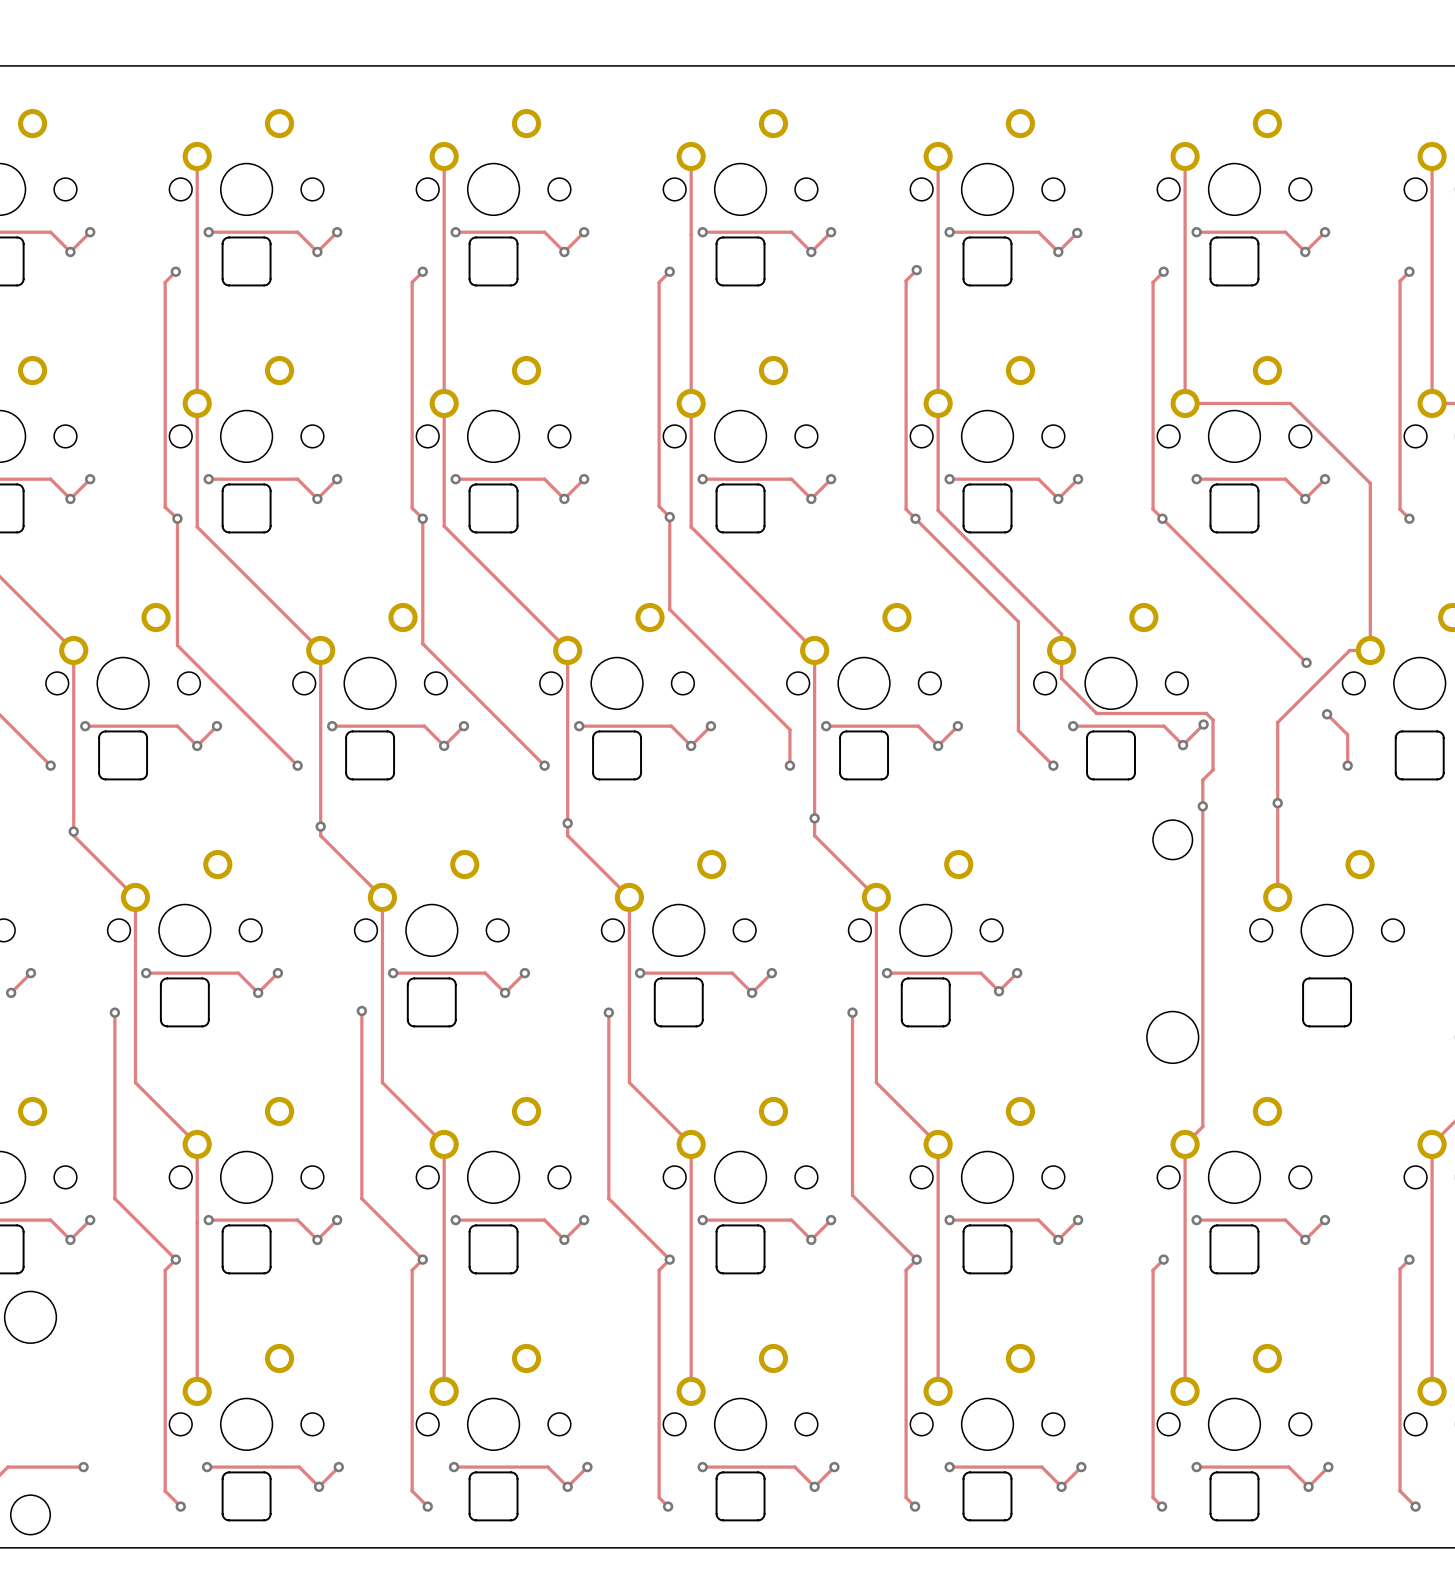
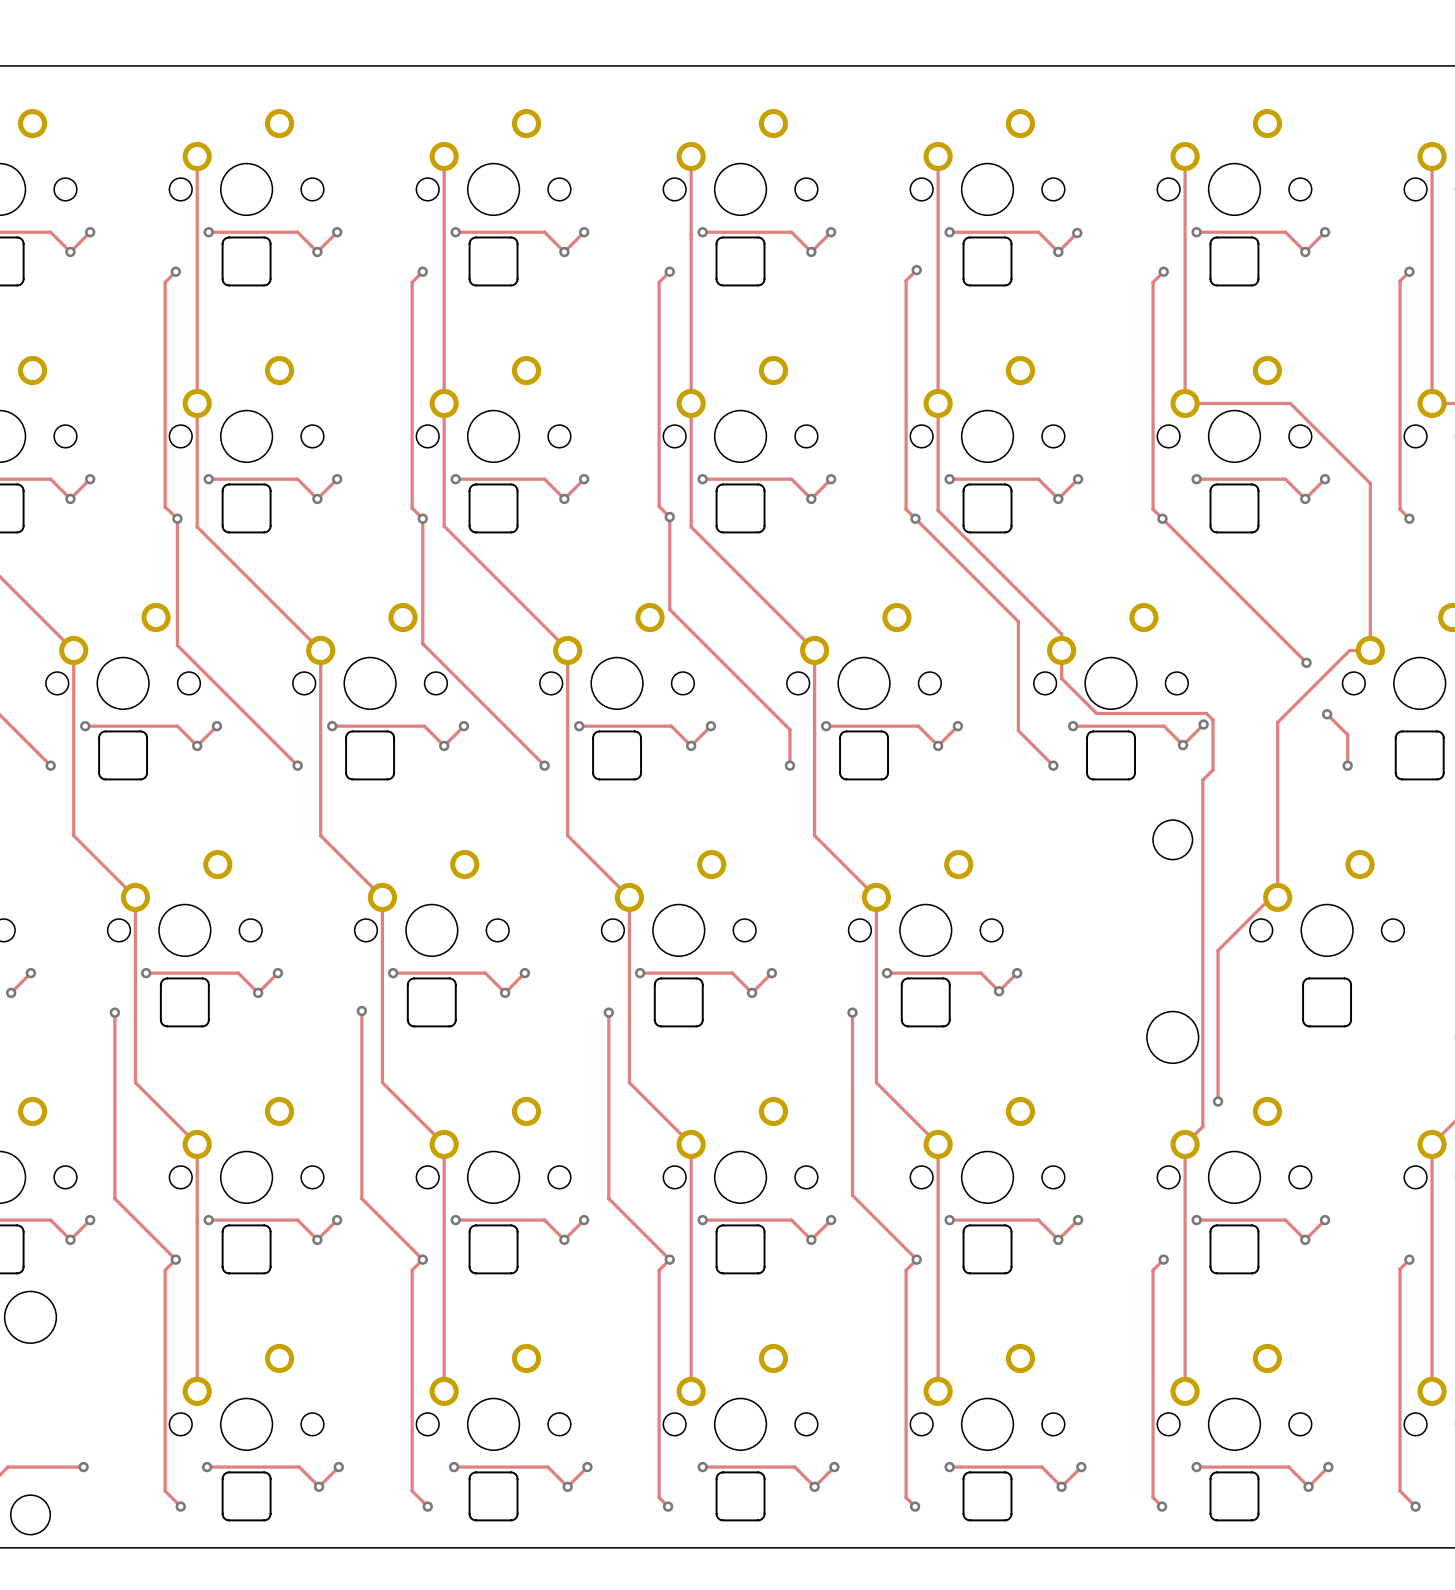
via: (1277, 803) -> none
via: (1202, 806) -> none
via: (814, 818) -> none
via: (567, 823) -> none
via: (320, 826) -> none
via: (73, 831) -> none
track: none -> (1277, 897) (1271, 897) (1218, 950) (1218, 1101)
via: none -> (1218, 1101)

